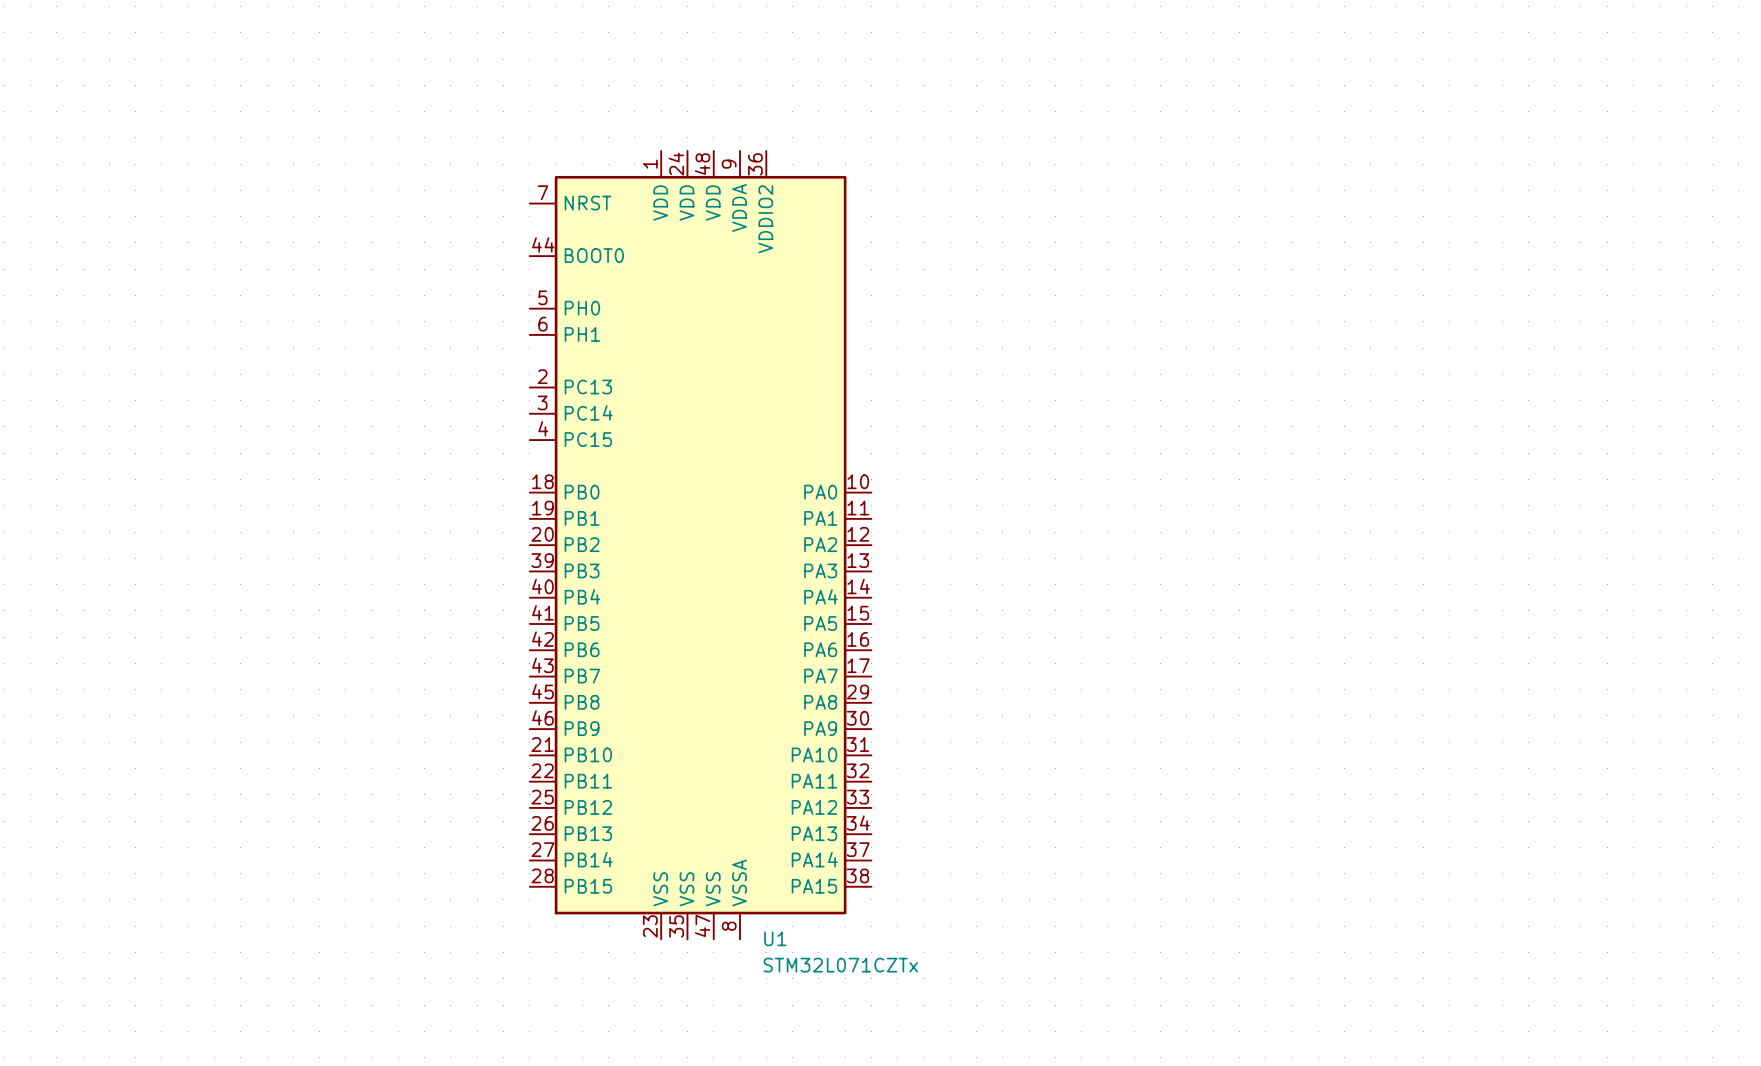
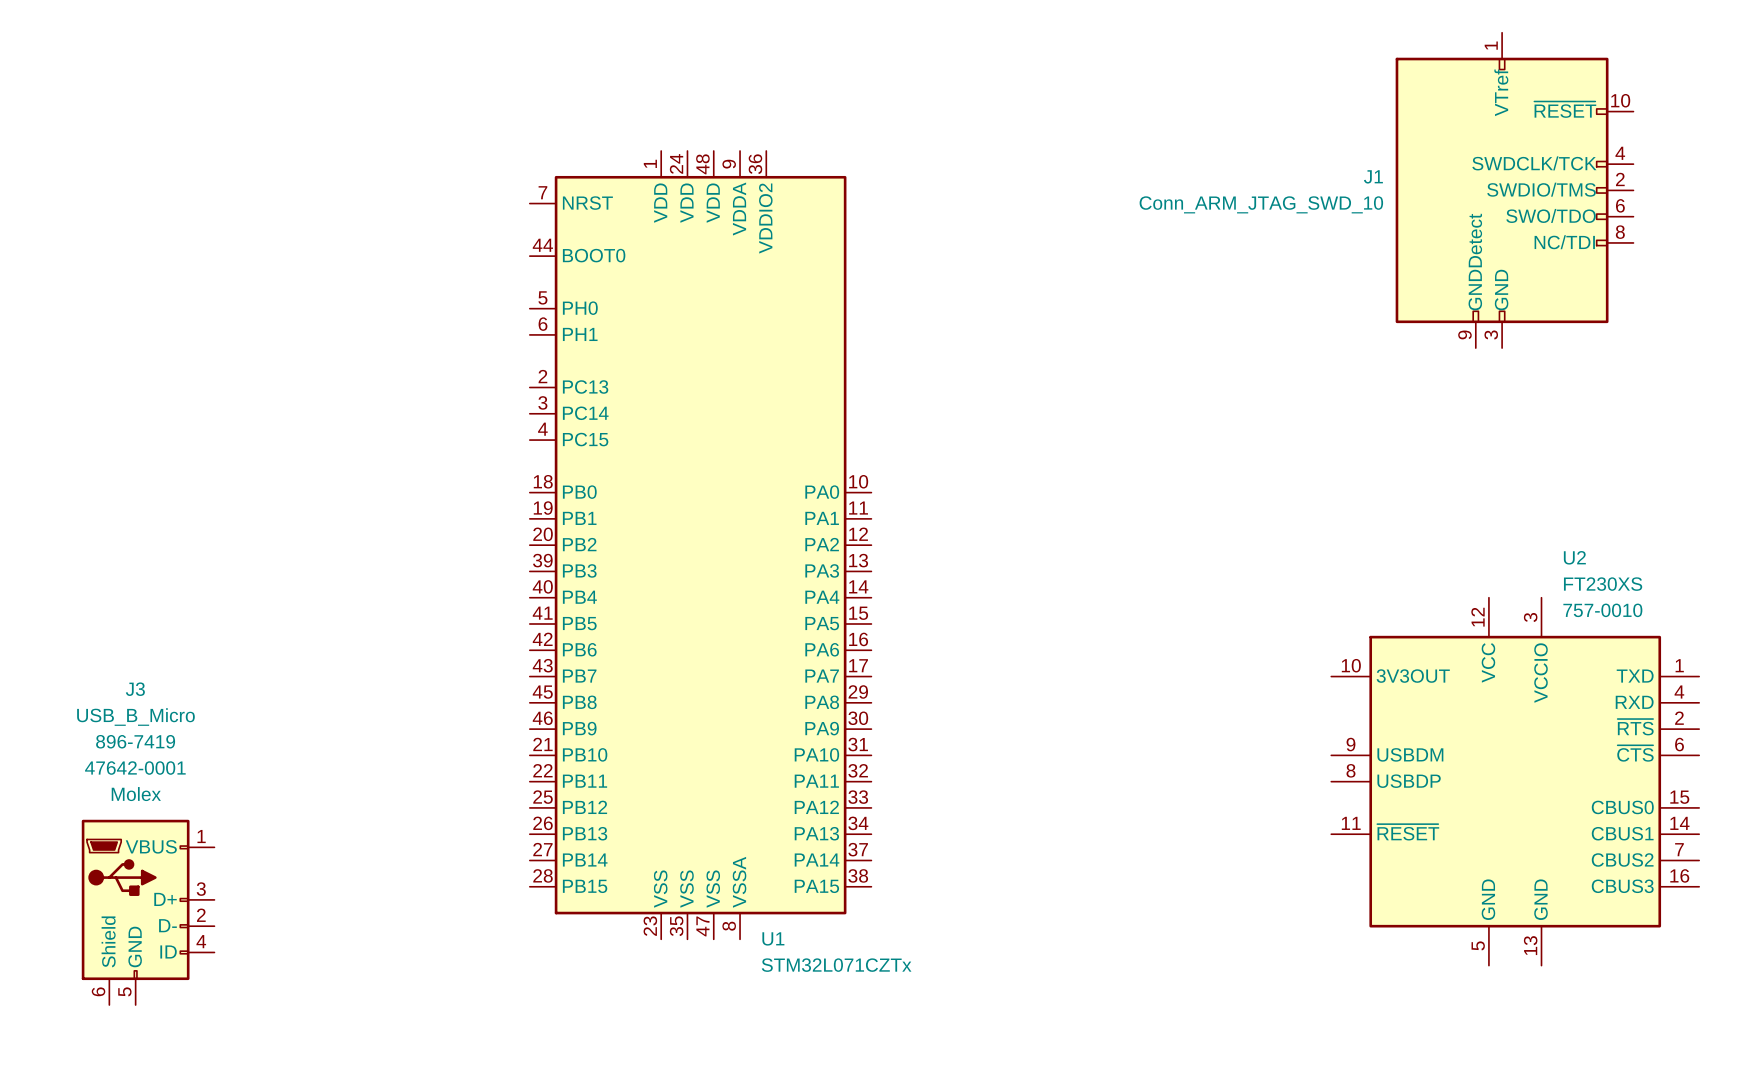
J1: none -> Conn_ARM_JTAG_SWD_10 (1514, 190)
U2: none -> FT230XS (1515, 781)
J3: none -> USB_B_Micro (148, 912)

